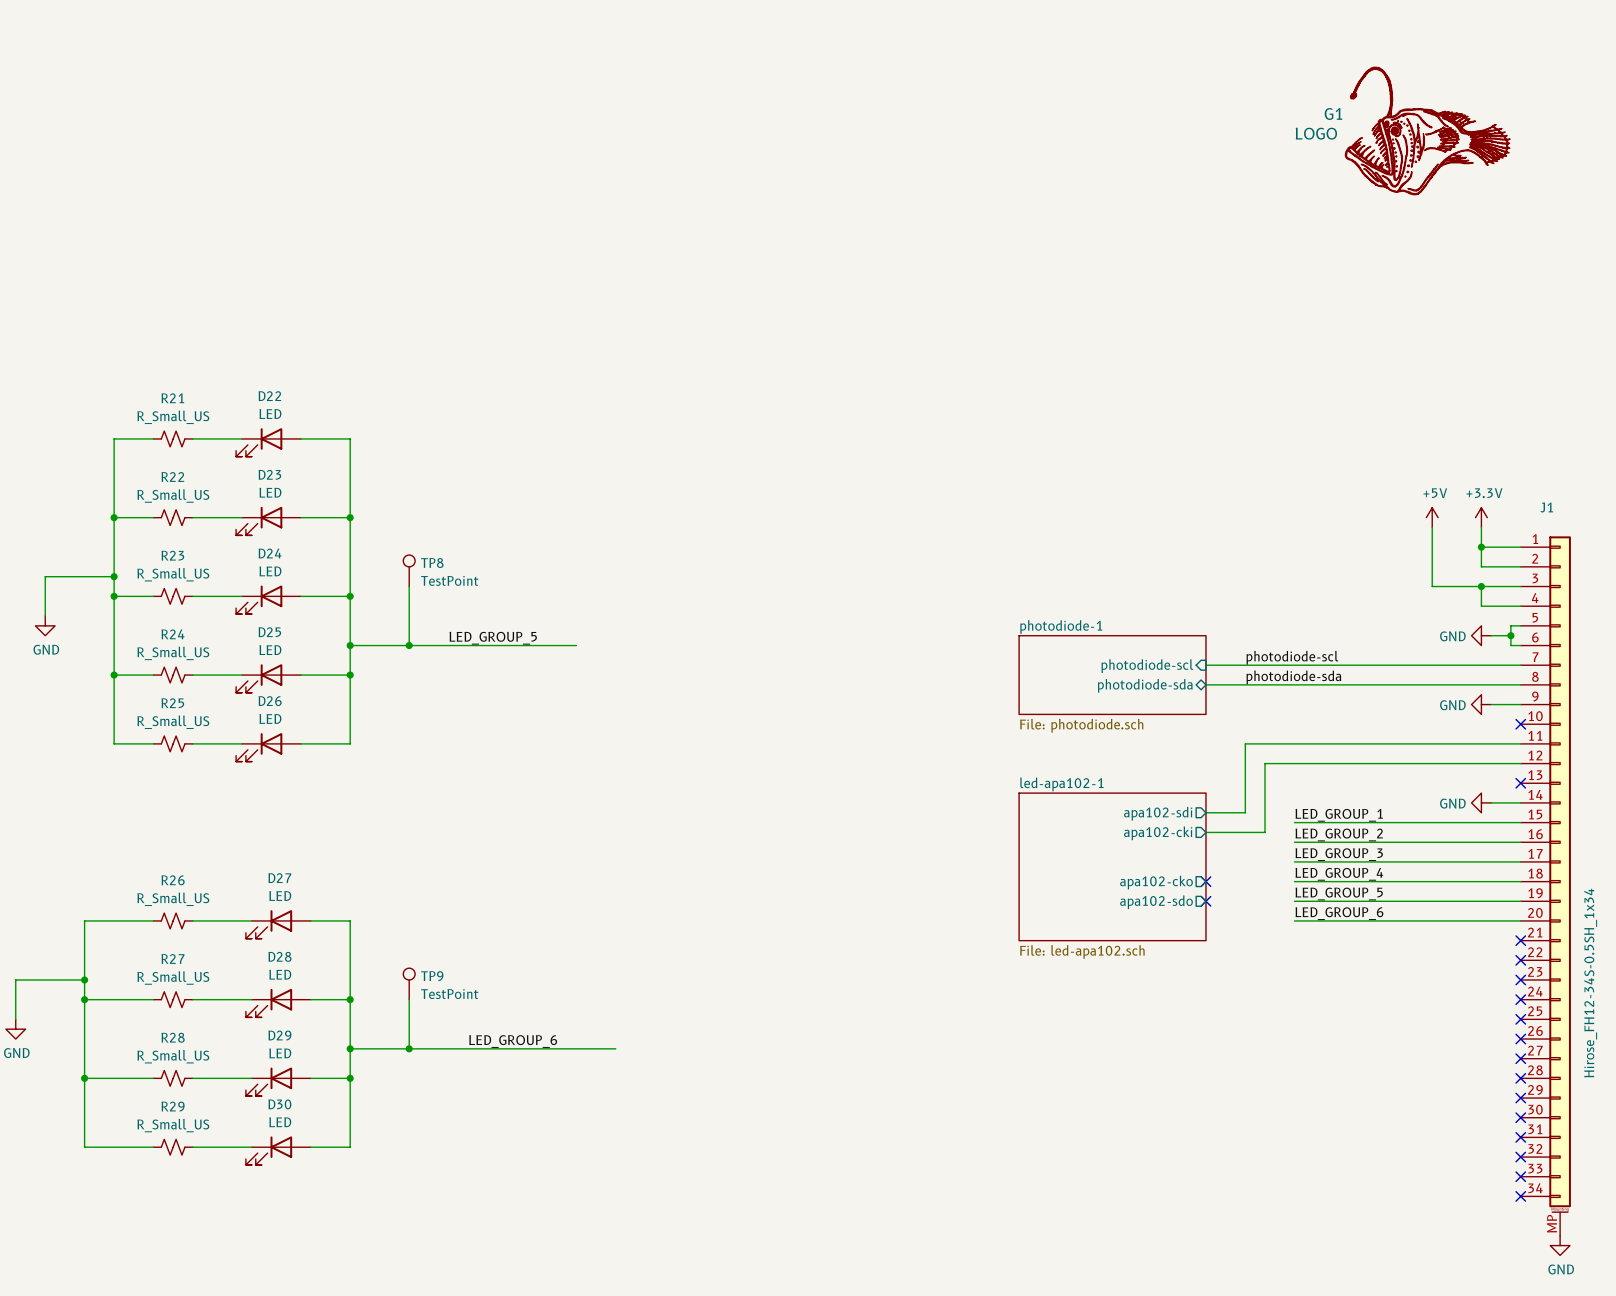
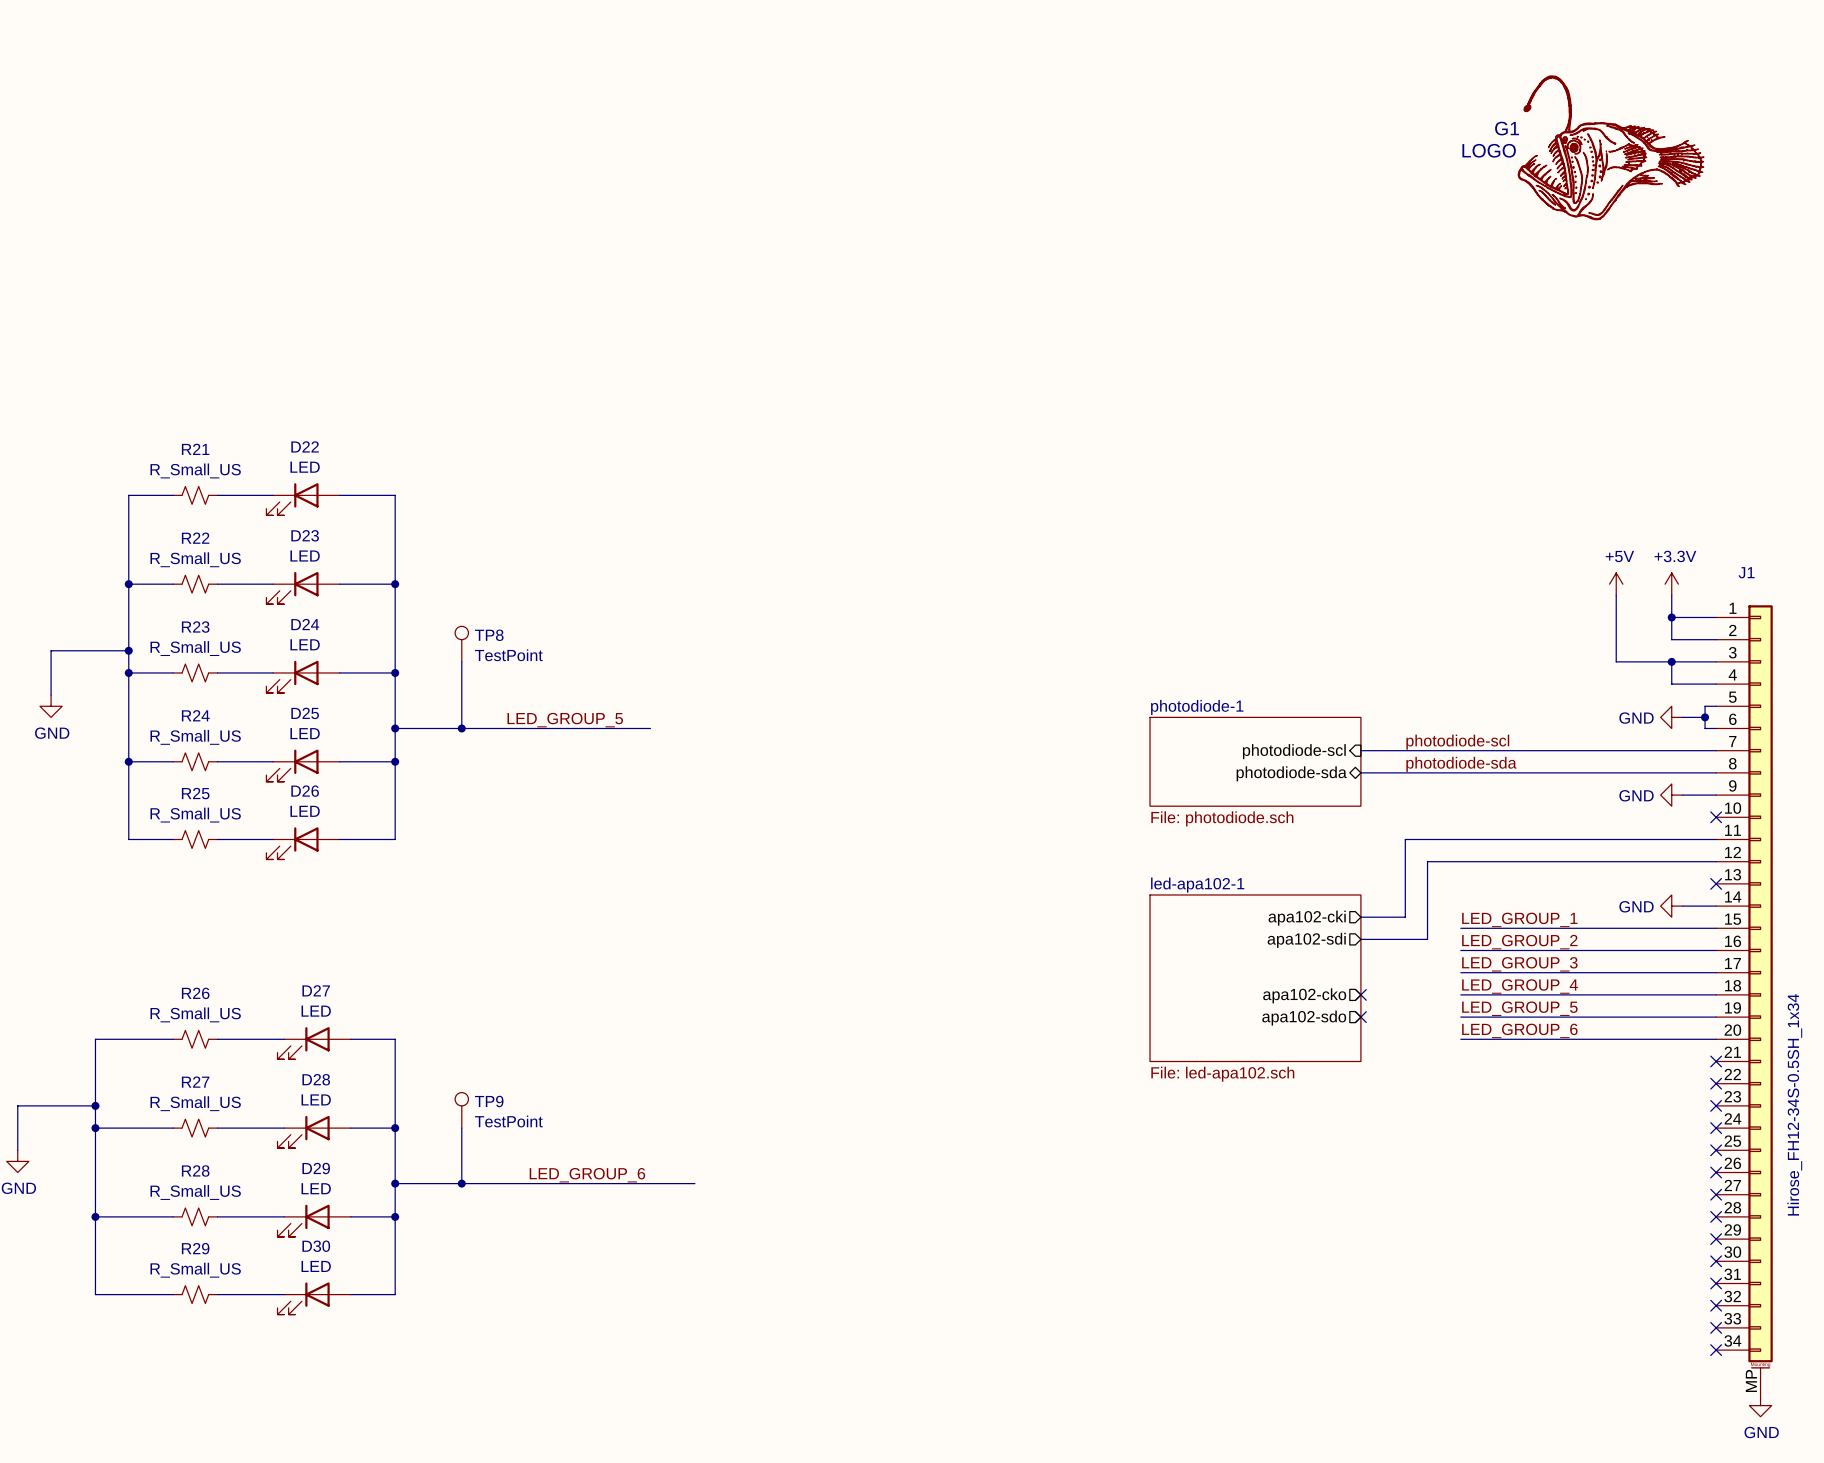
sheet pin: apa102-sdi (1158, 813) -> apa102-cki (1307, 918)
sheet pin: apa102-cki (1158, 833) -> apa102-sdi (1306, 940)

